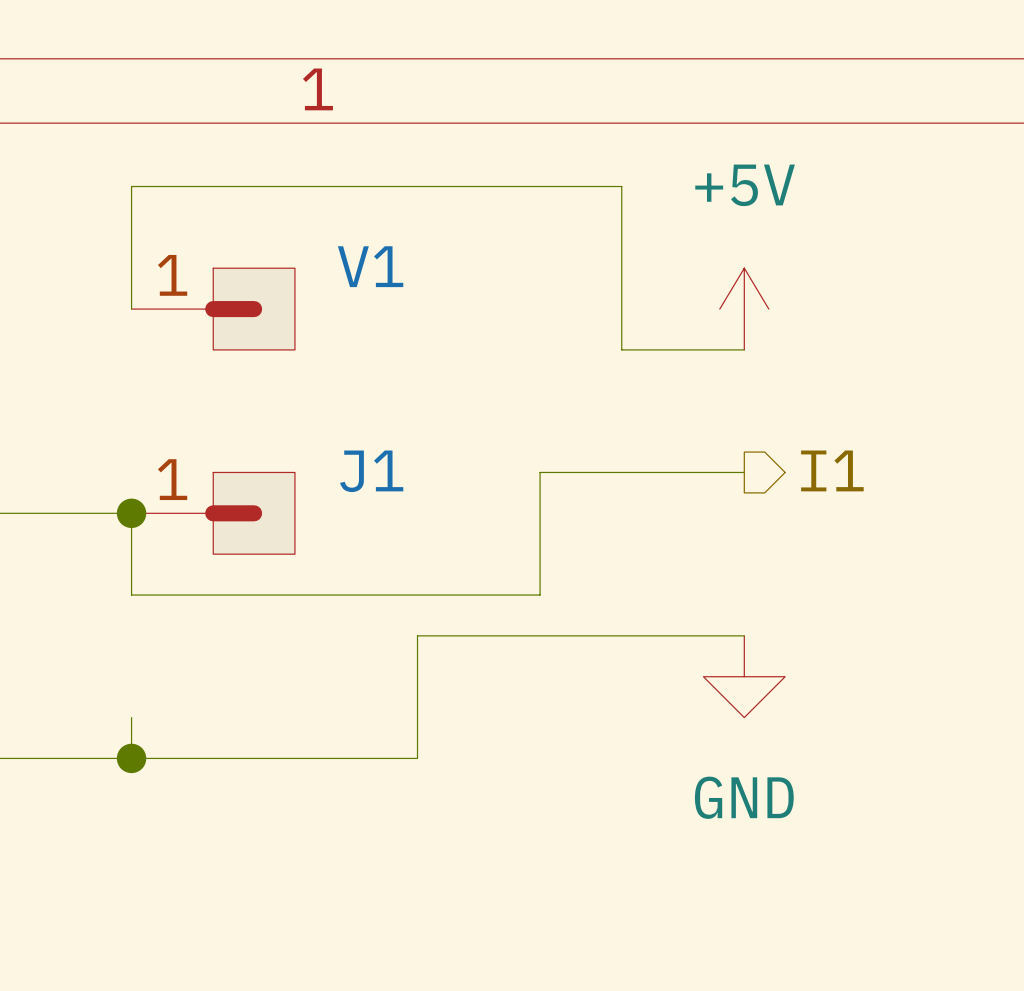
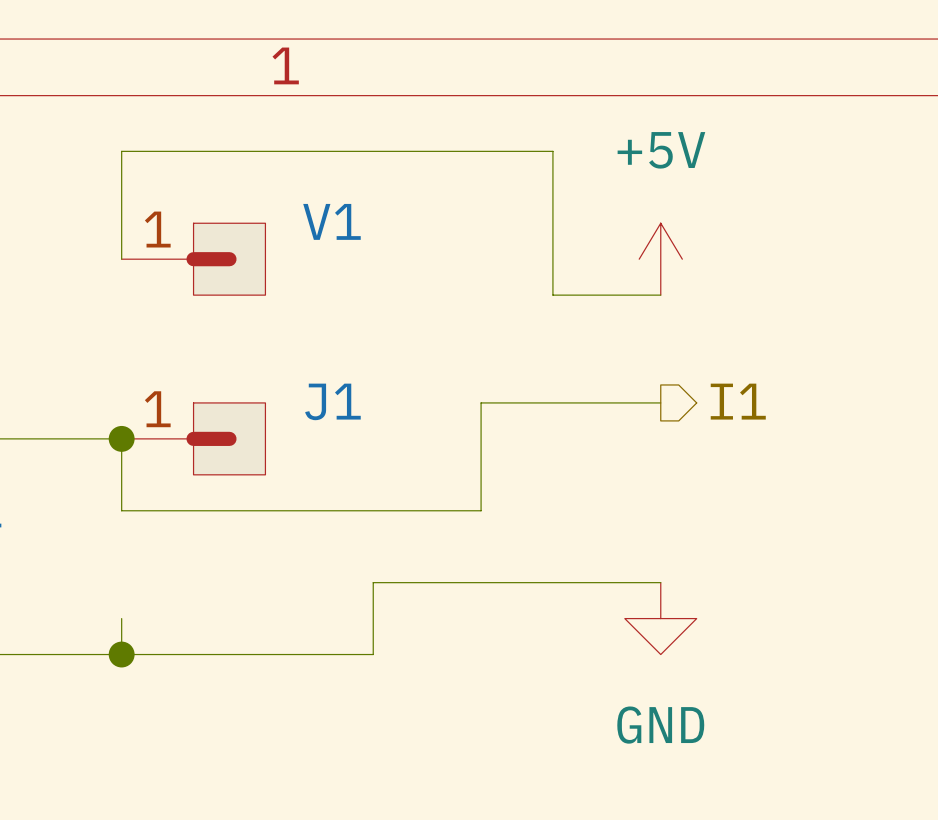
wire: (744, 635) (417, 635) (417, 676) -> (660, 582) (373, 582)
power symbol position: GND (744, 676) -> GND (660, 618)

